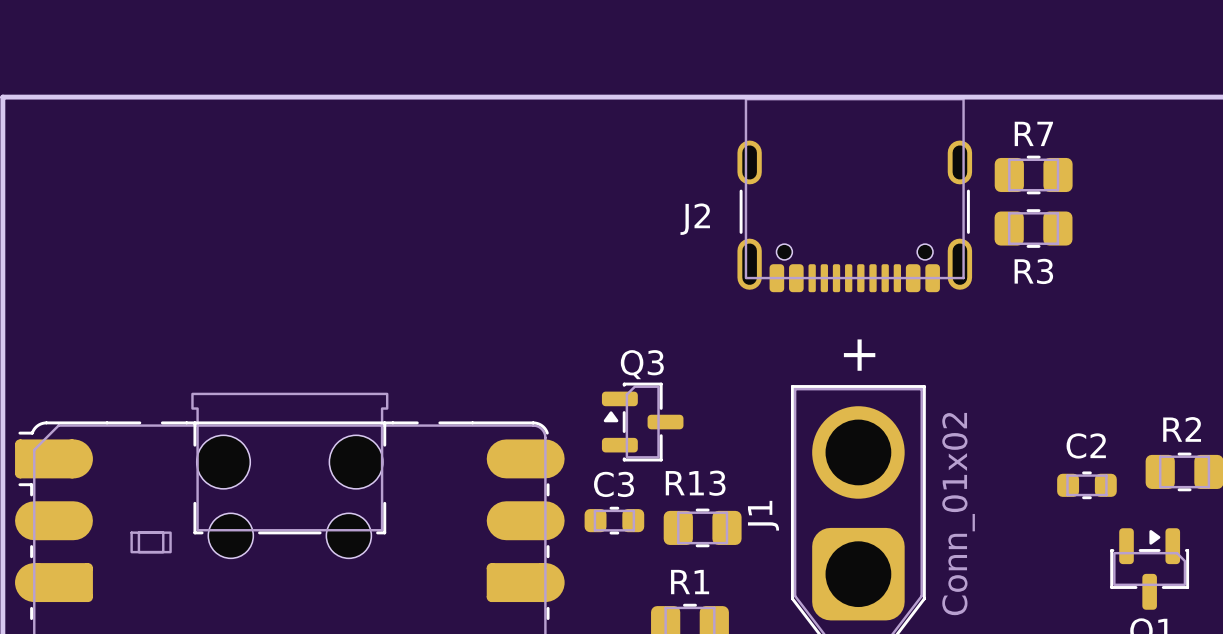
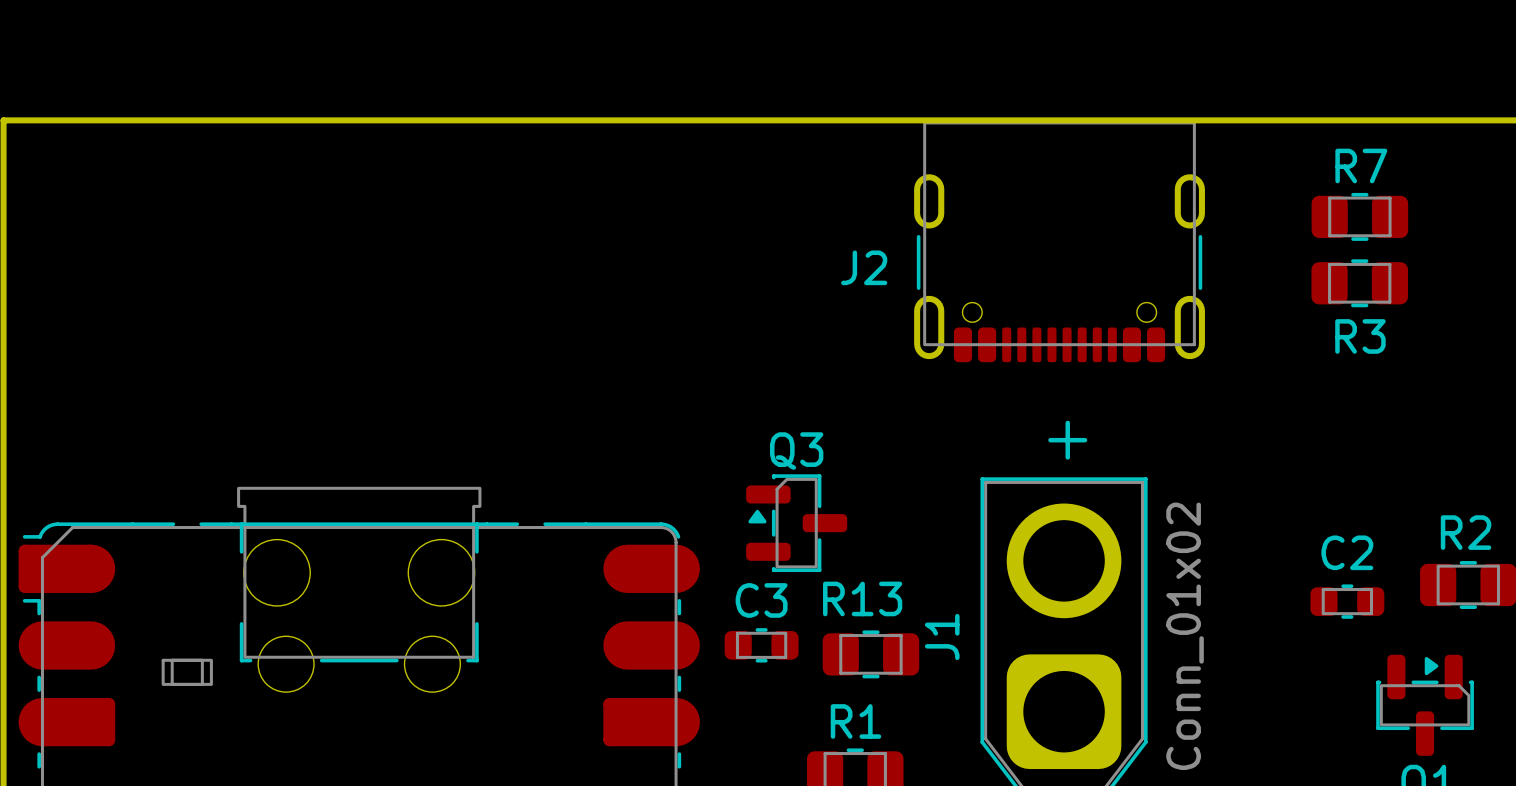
R7 position: (1033, 174) -> (1359, 216)
R3 position: (1033, 228) -> (1359, 283)

